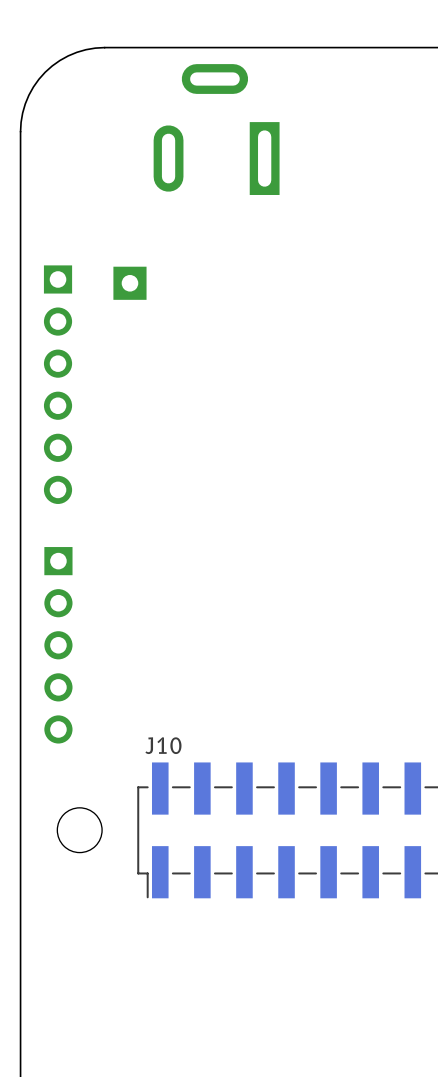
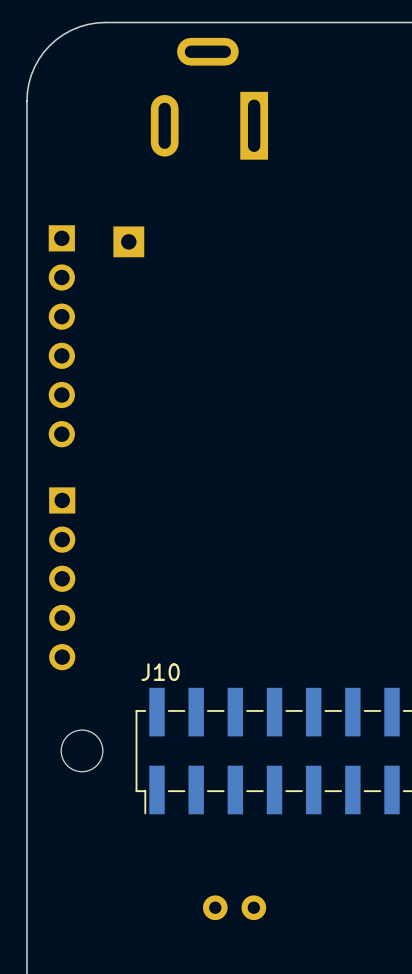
part: none -> (234, 907)

